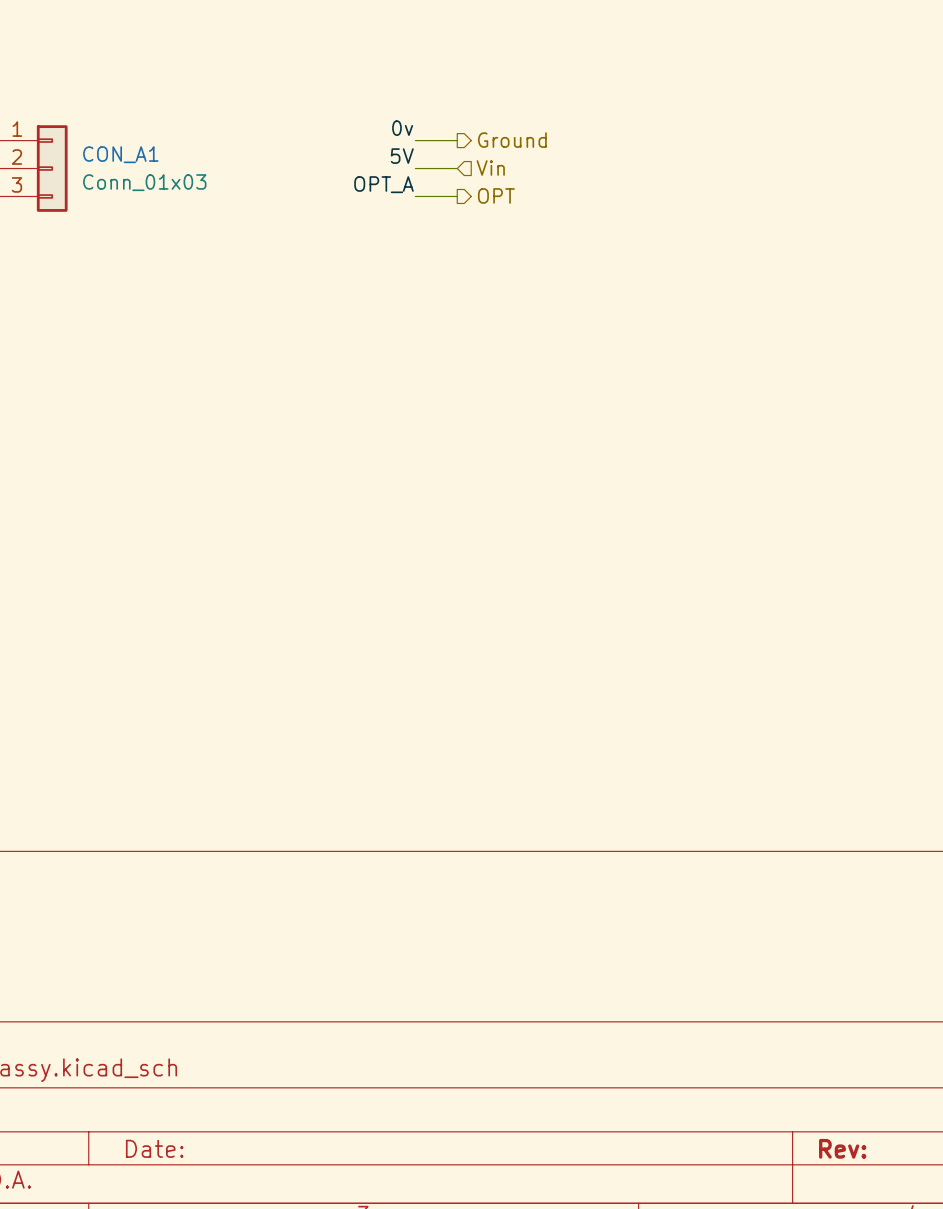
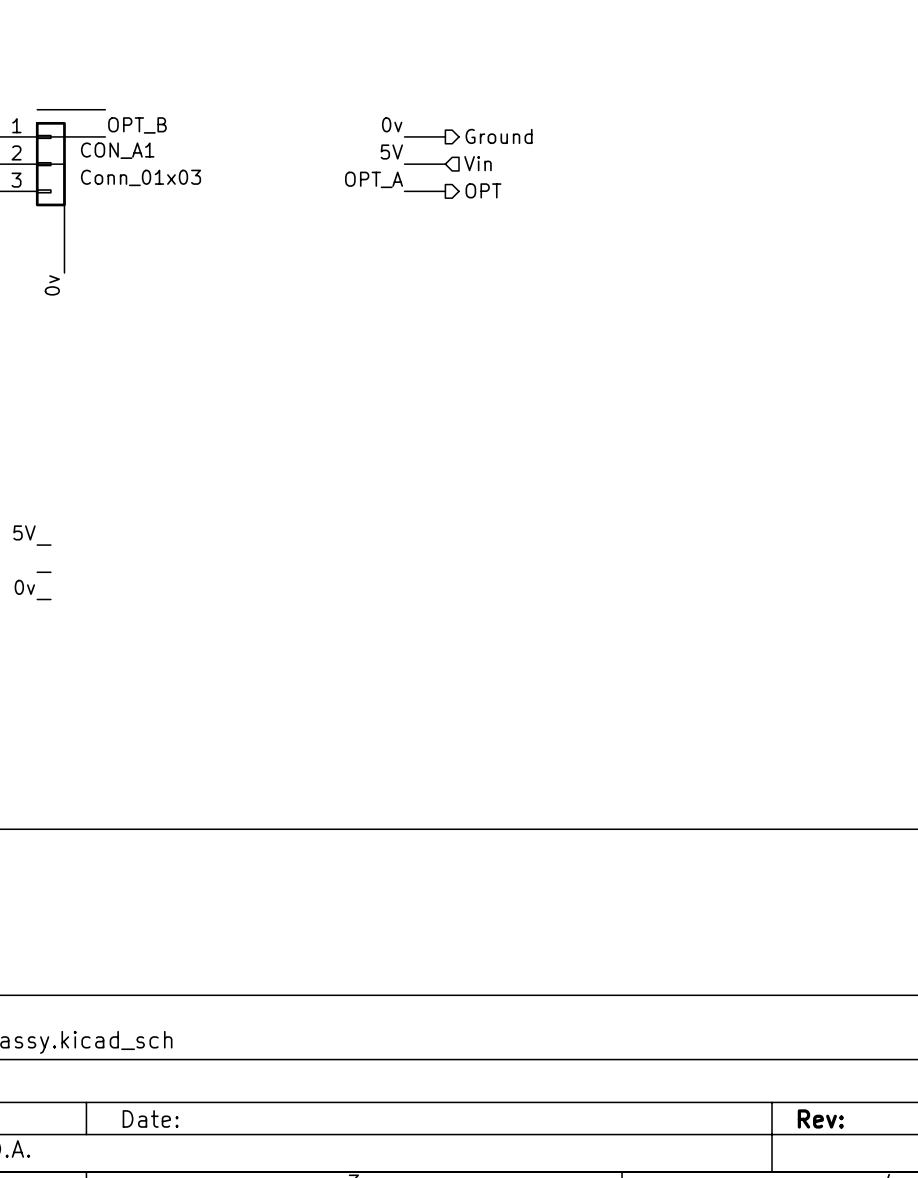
wire: none -> (37, 109) (105, 109)
label: none -> OPT_B (137, 125)
wire: none -> (37, 136) (105, 136)
wire: none -> (37, 164) (64, 164) (64, 272)
label: none -> 0v (52, 285)
label: none -> 5V (24, 532)
wire: none -> (37, 545) (50, 545)
wire: none -> (37, 572) (50, 572)
label: none -> 0v (24, 587)
wire: none -> (37, 599) (50, 599)

